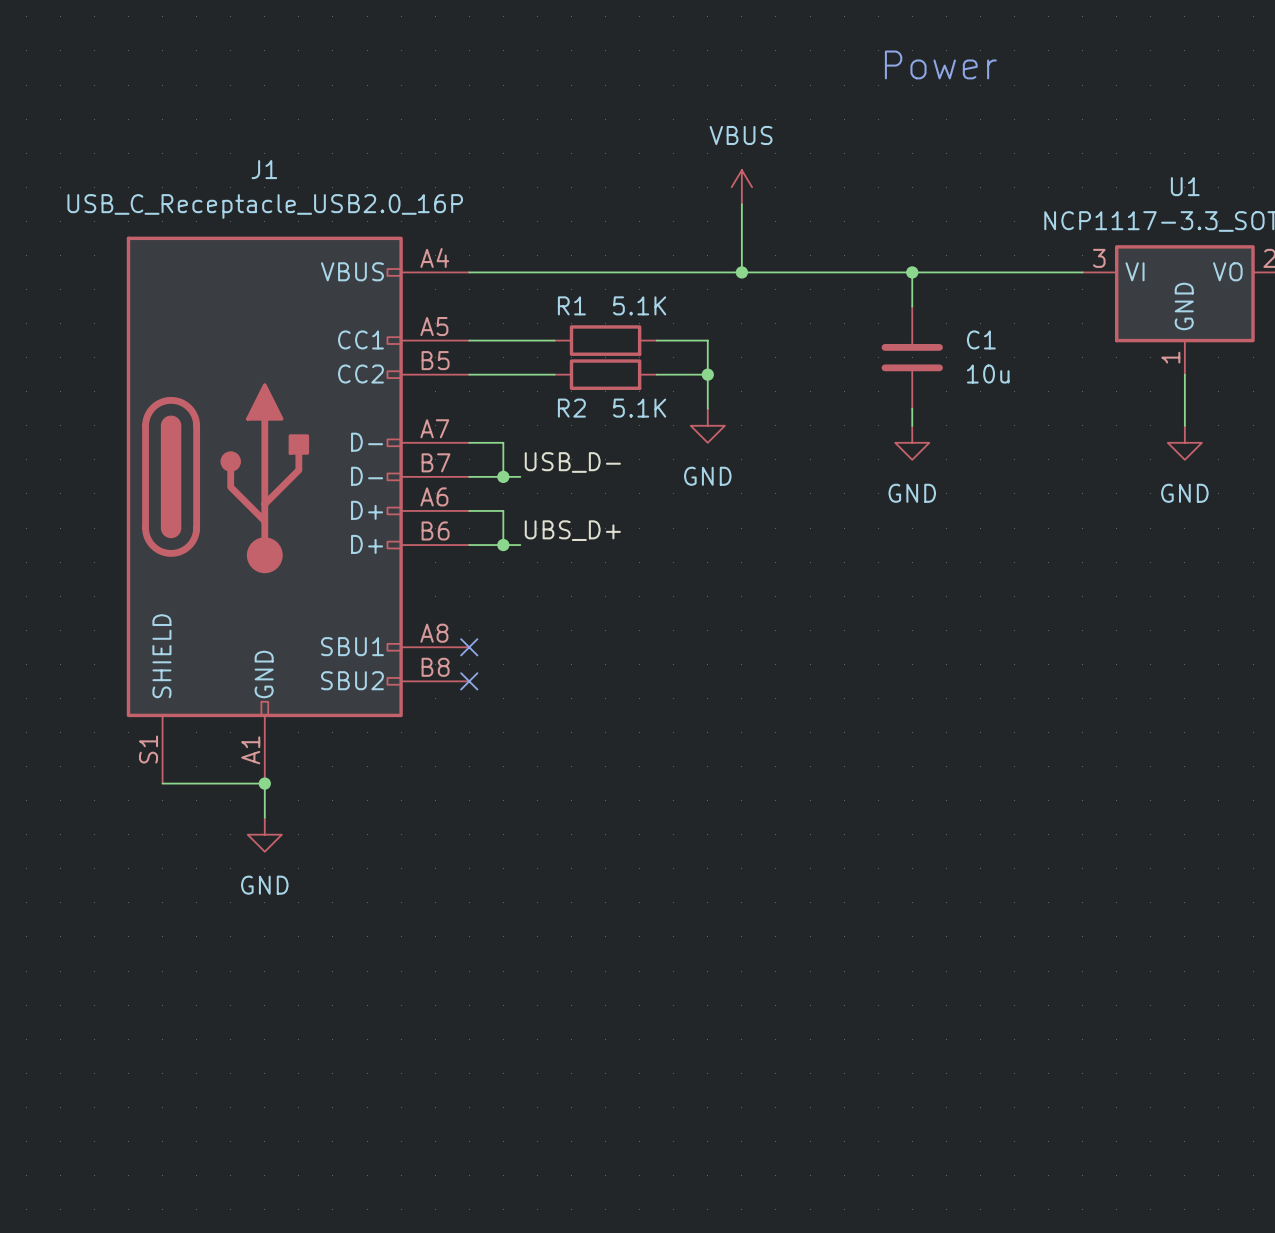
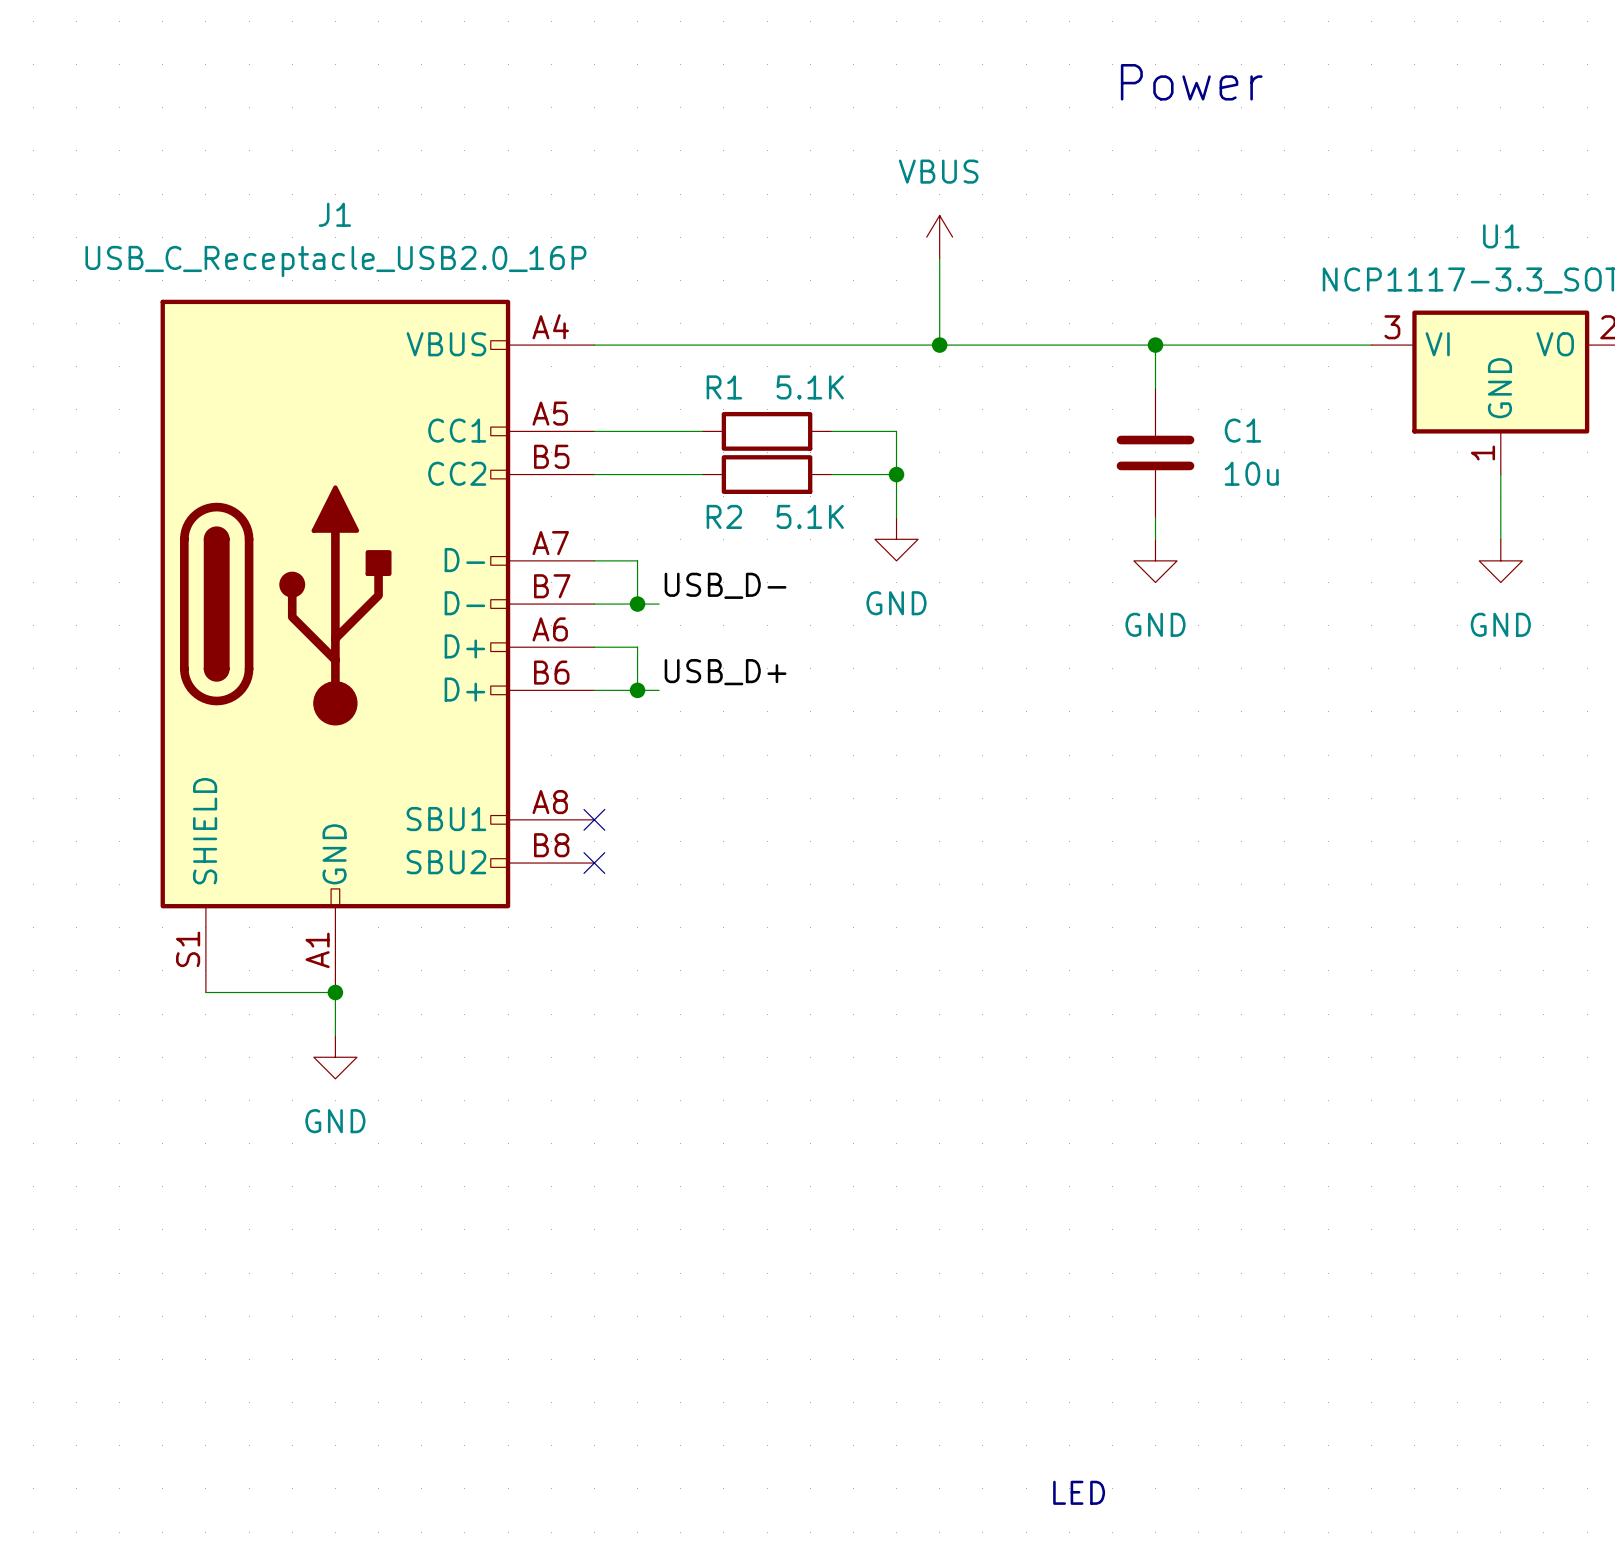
label: UBS_D+ (572, 530) -> USB_D+ (725, 672)
text: none -> LED (1079, 1492)

